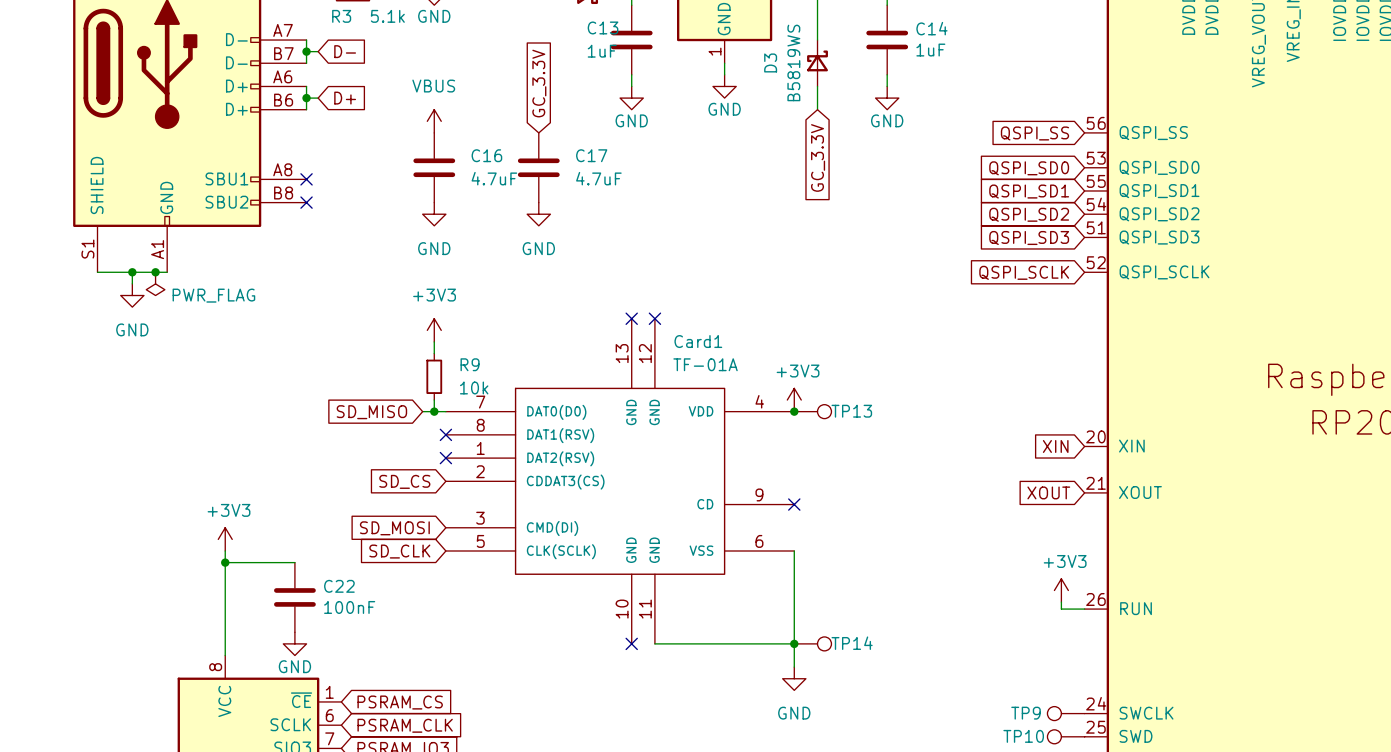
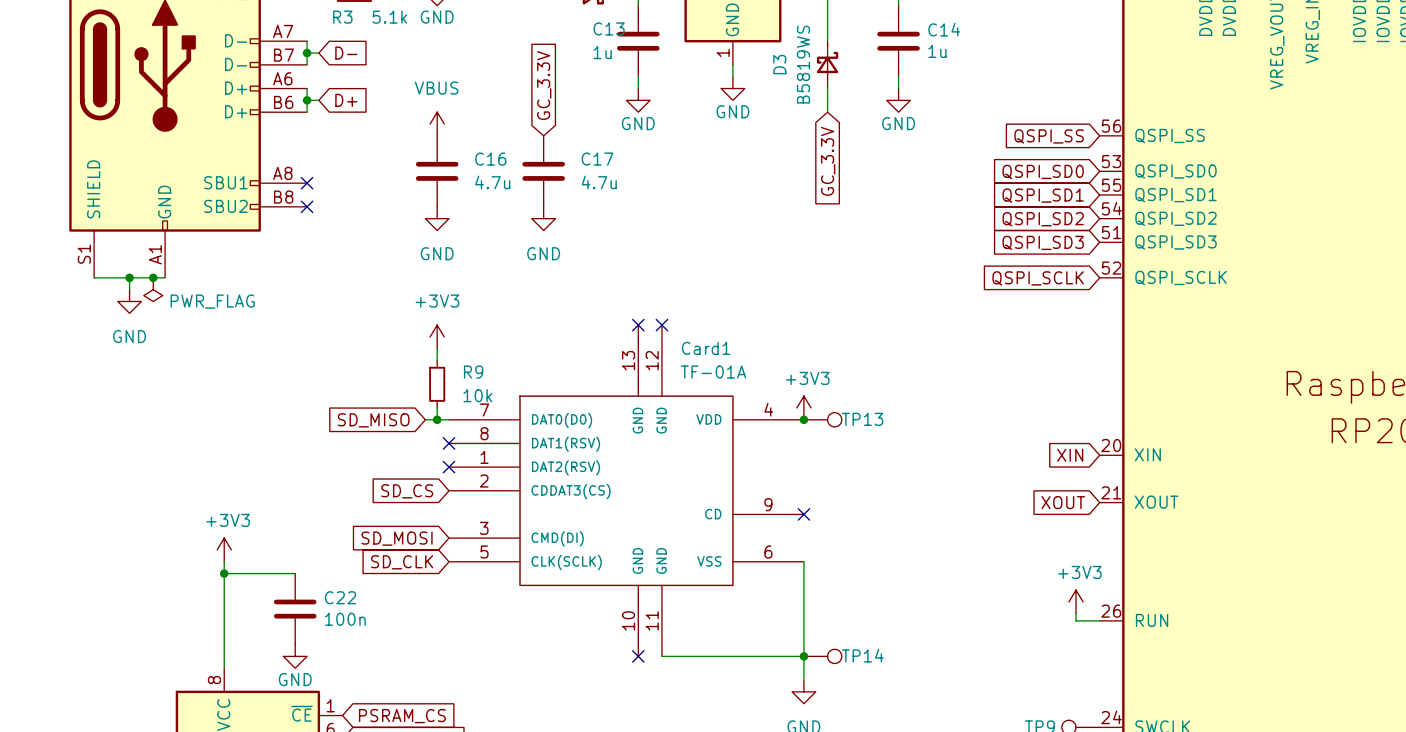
C14 value: 1uF (930, 50) -> 1u (937, 51)
C13 value: 1uF (602, 51) -> 1u (602, 52)
C16 value: 4.7uF (494, 178) -> 4.7u (492, 182)
C17 value: 4.7uF (598, 178) -> 4.7u (599, 182)
C22 value: 100nF (349, 607) -> 100n (345, 619)

